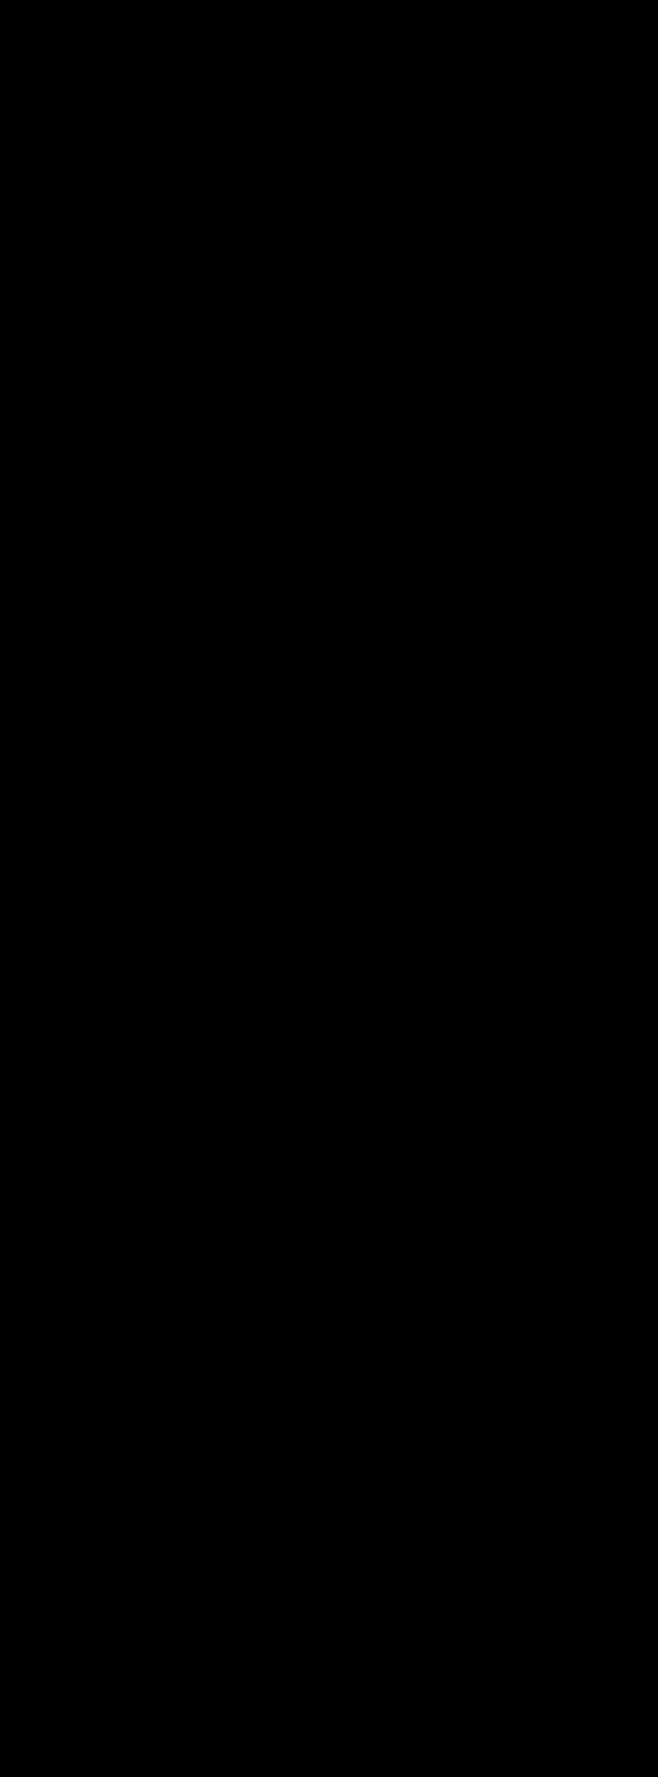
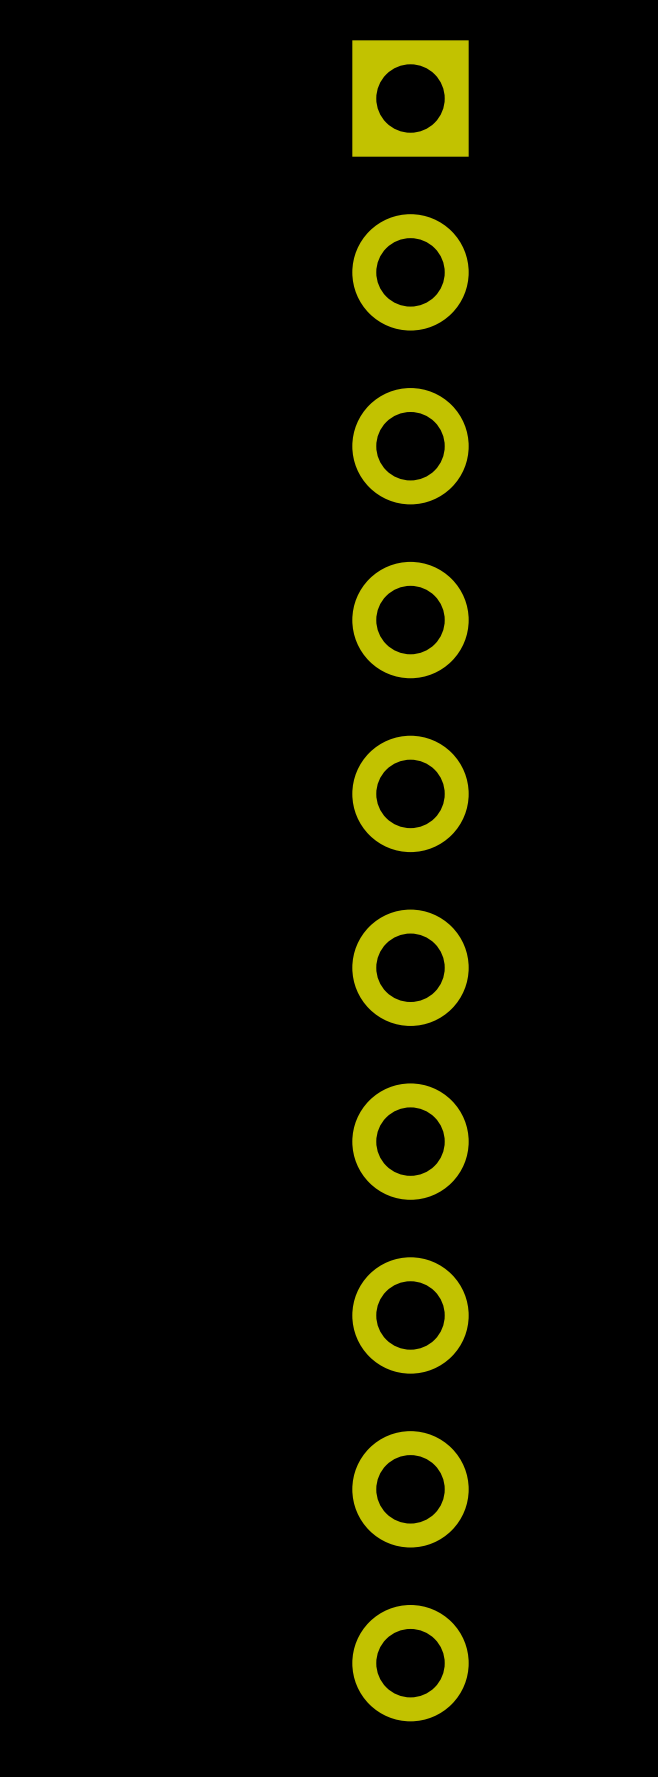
part: none -> (410, 880)

